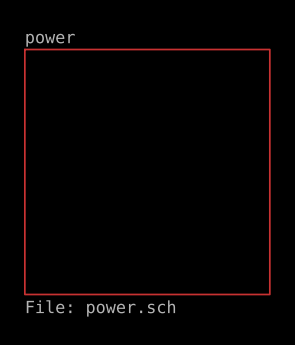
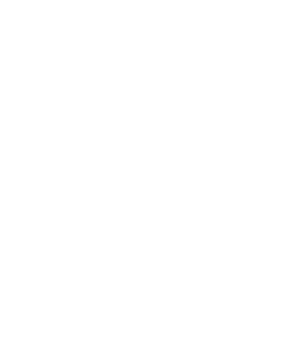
sheet power: File: power.sch (147, 171) -> none

